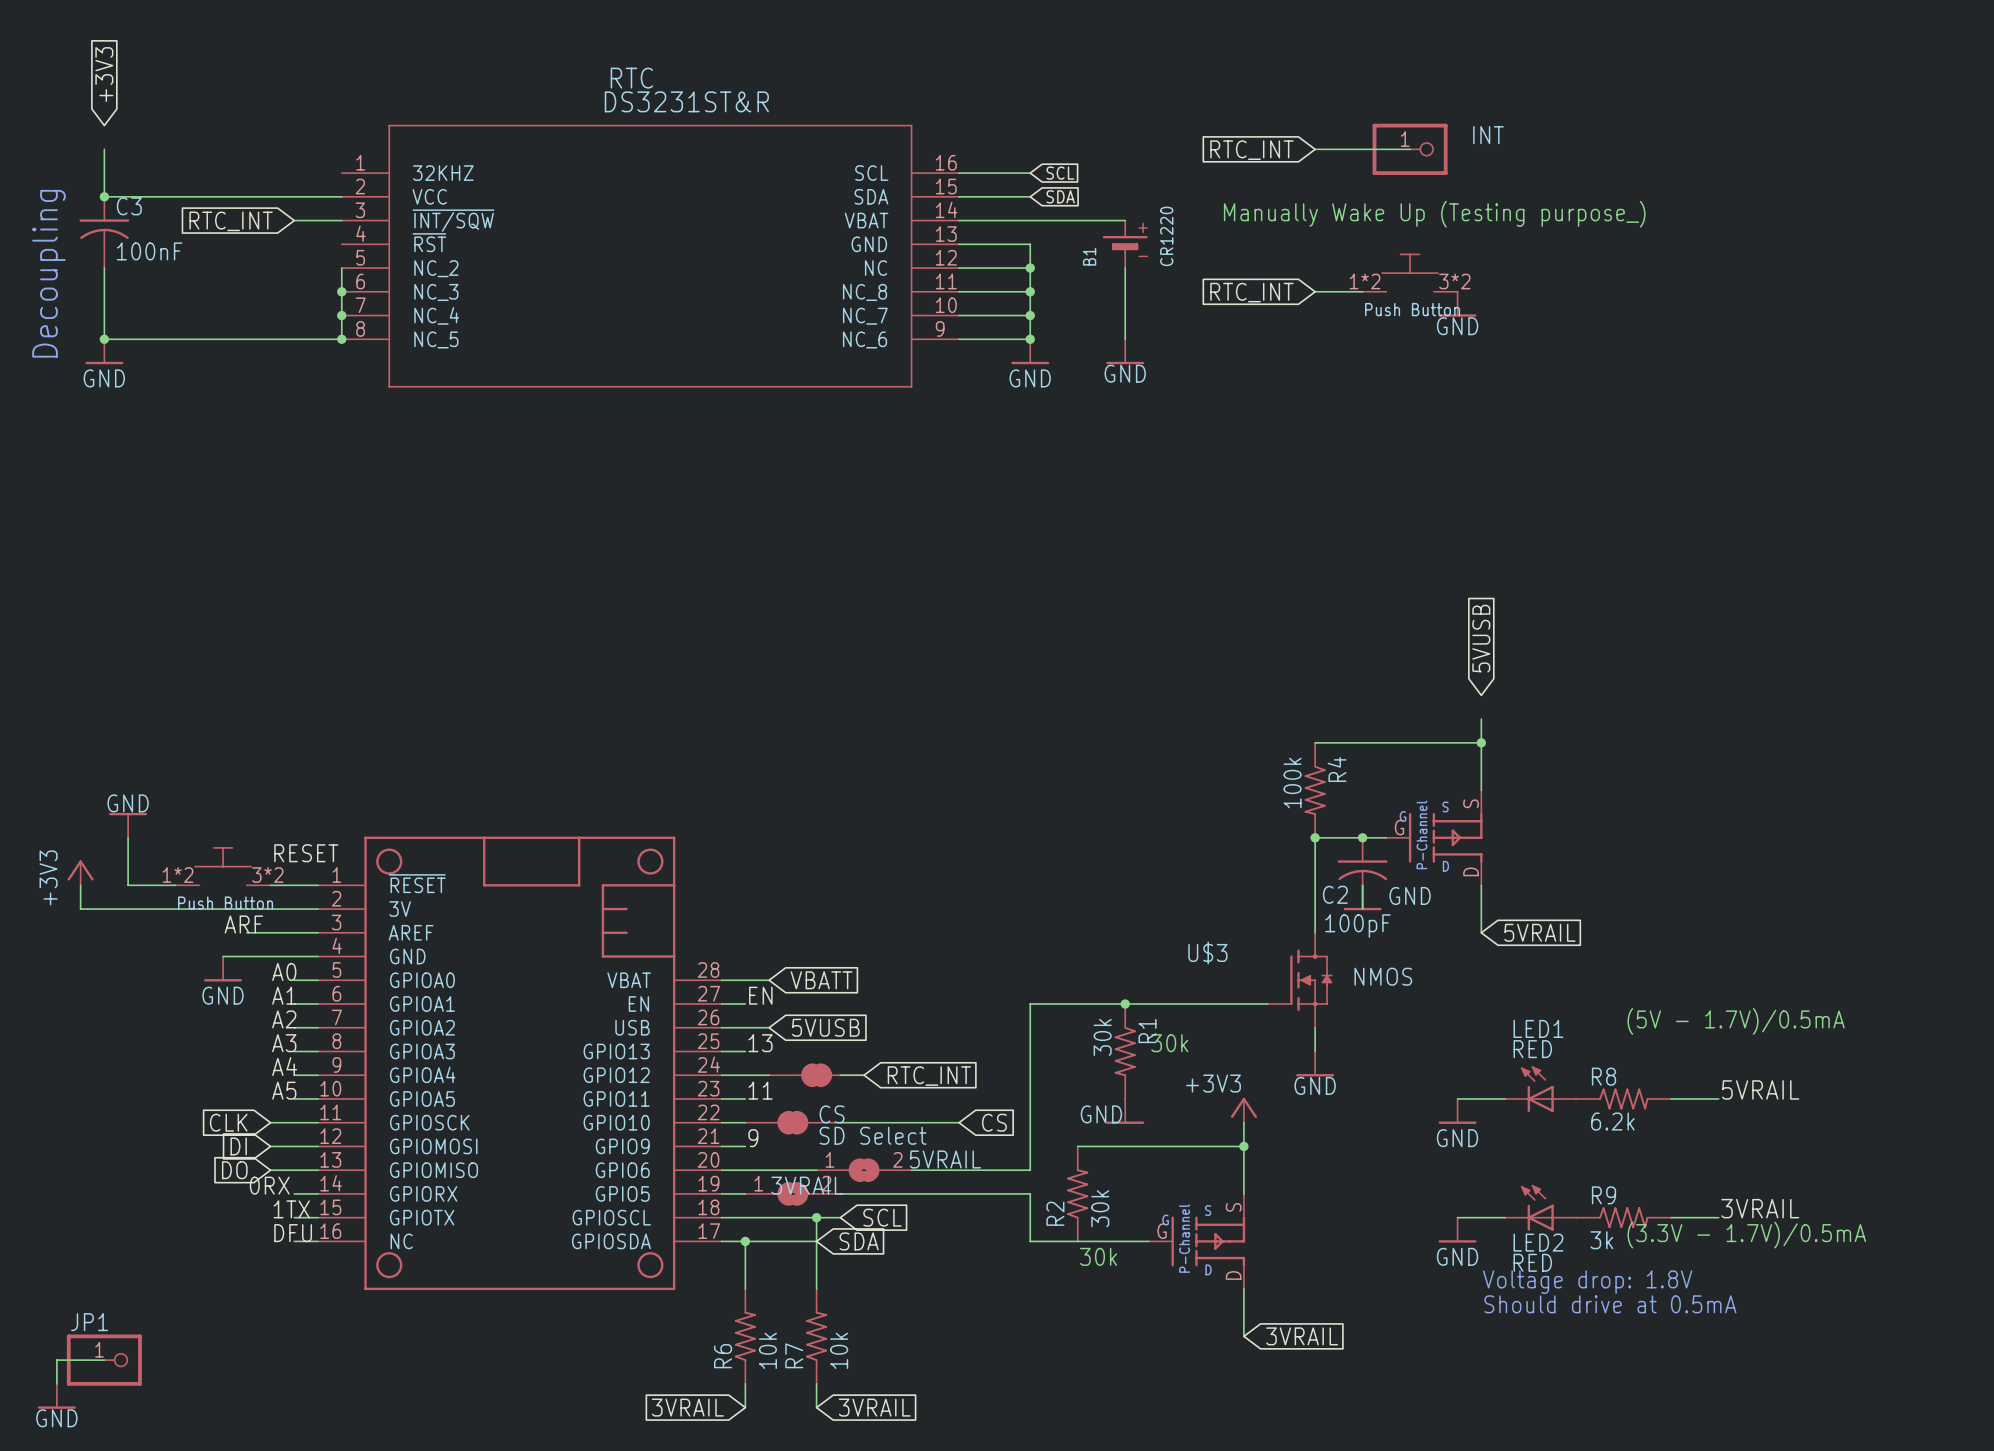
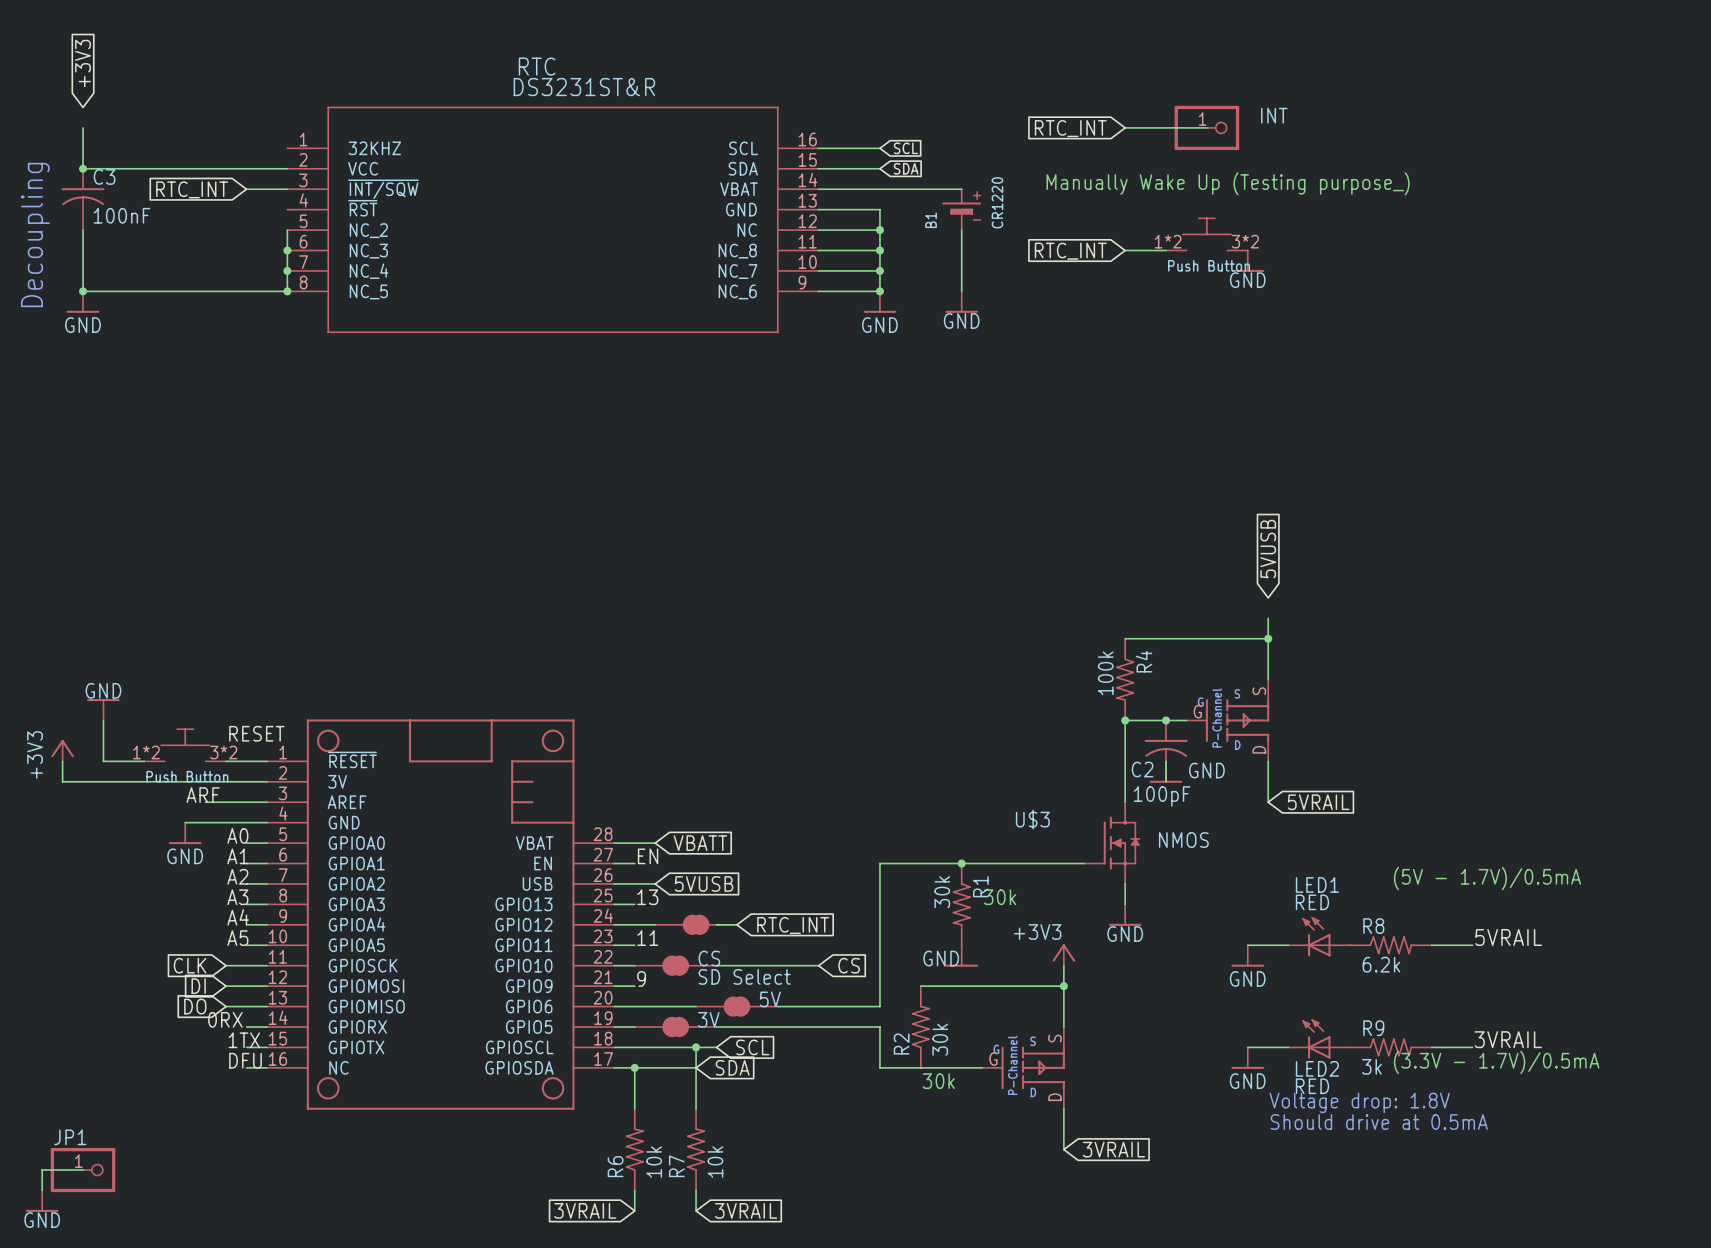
5VRAIL: (864, 1170) -> none
5V: none -> (736, 1006)
3VRAIL: (792, 1193) -> none
3V: none -> (675, 1027)

